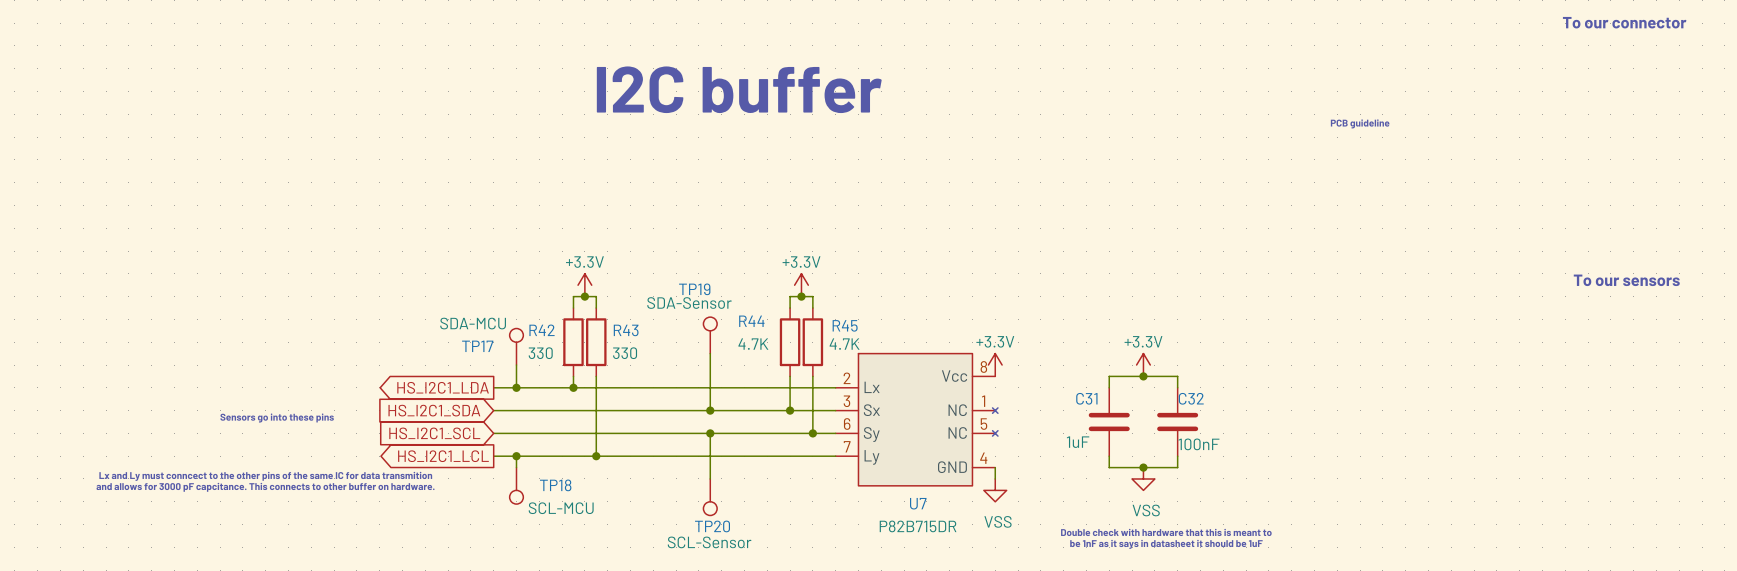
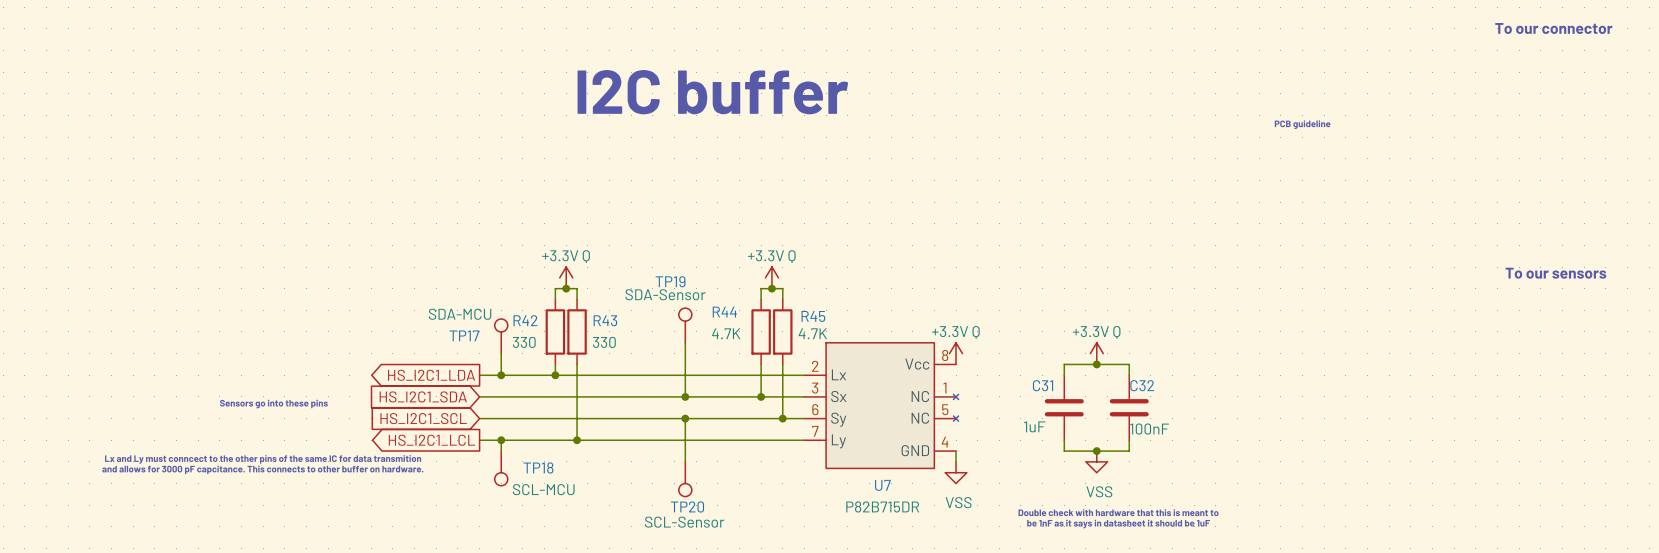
power symbol: +3.3V (584, 285) -> +3.3V Q (566, 277)
power symbol: +3.3V (801, 285) -> +3.3V Q (771, 277)
power symbol: +3.3V (995, 365) -> +3.3V Q (956, 353)
power symbol: +3.3V (1143, 365) -> +3.3V Q (1096, 353)

